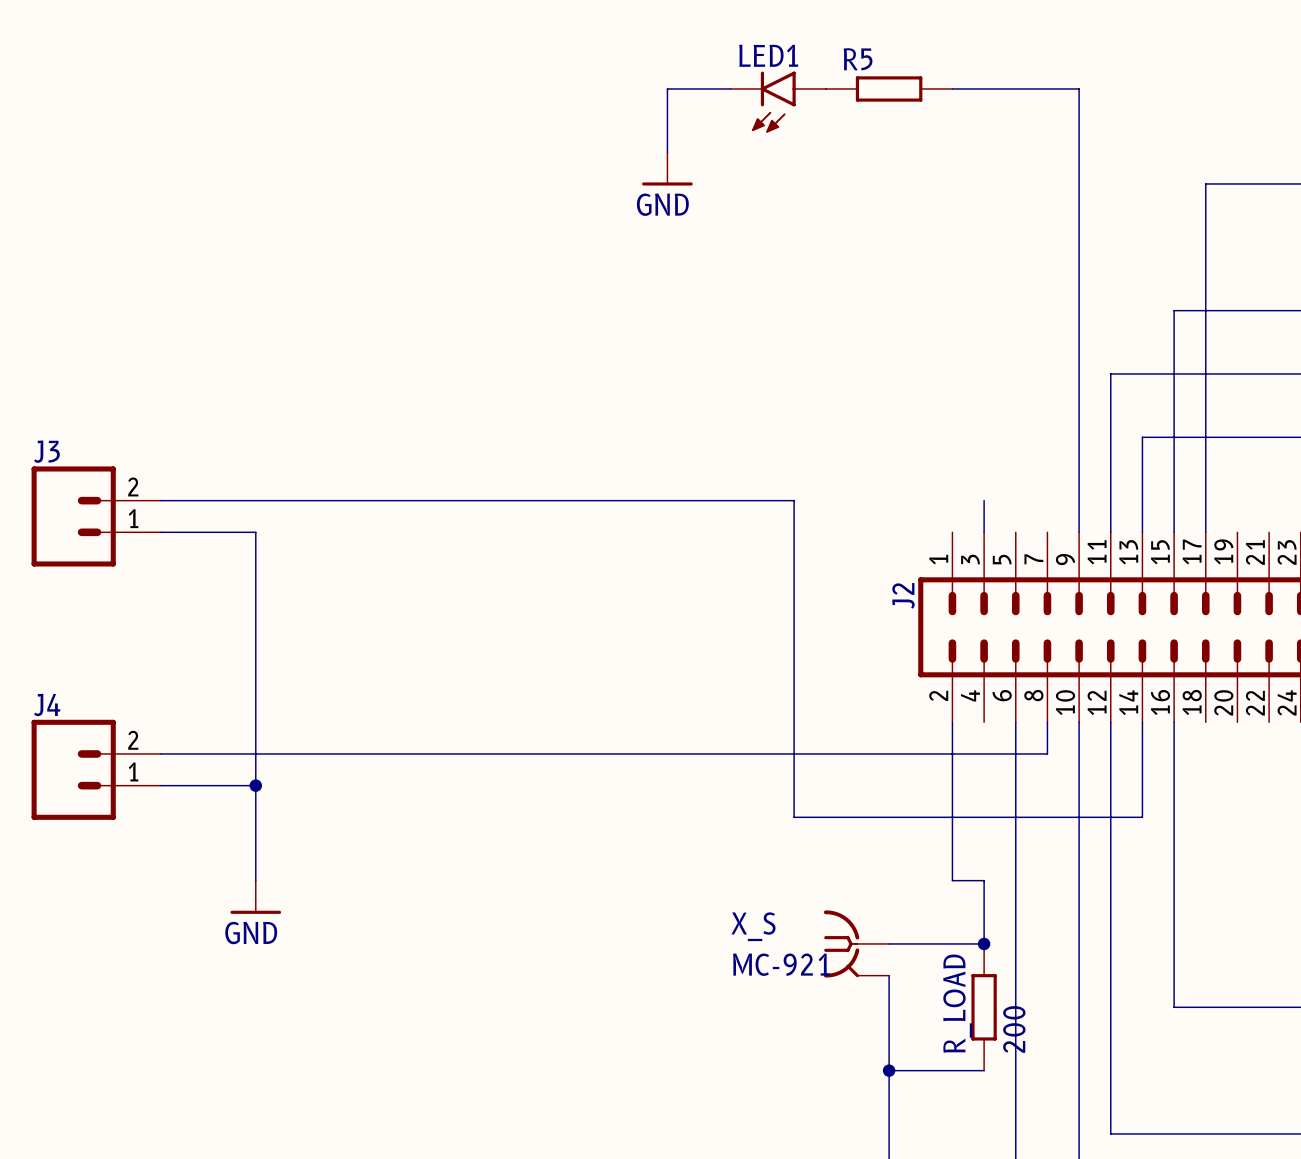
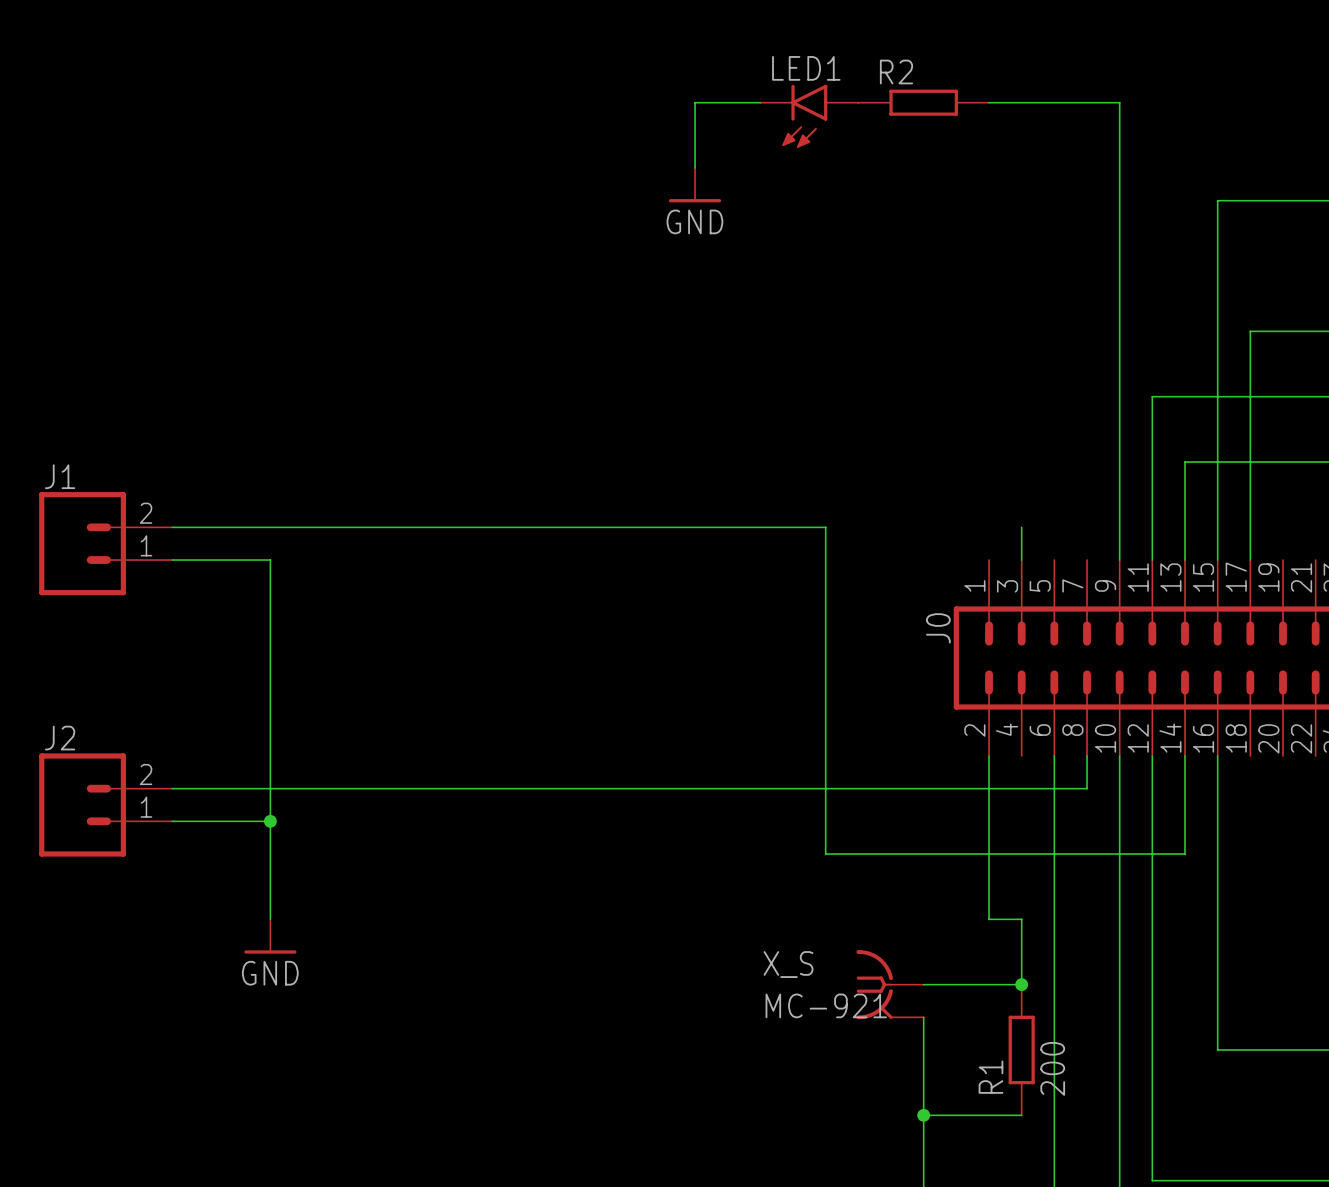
R5 name: R5 (858, 59) -> R2 (896, 72)
wire: (1205, 183) (1205, 310) (1174, 310) -> (1250, 200) (1217, 200) (1217, 331)
J3 name: J3 (46, 451) -> J1 (60, 476)
J2 name: J2 (903, 595) -> J0 (938, 628)
J4 name: J4 (47, 705) -> J2 (60, 738)
R_LOAD name: R_LOAD (957, 1003) -> R1 (990, 1077)

